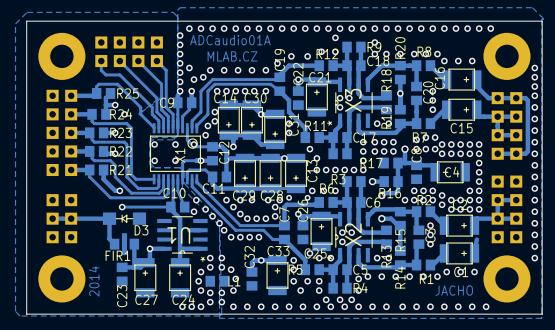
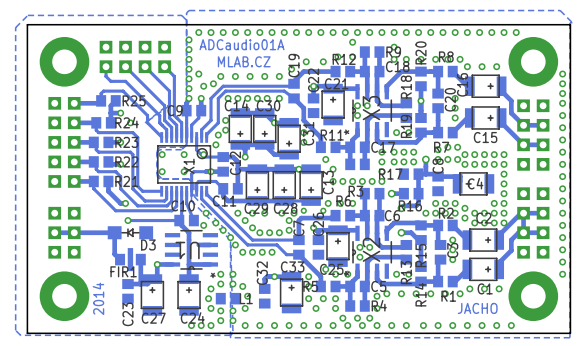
track: (476, 84) (488, 98) (525, 98) (527, 100) (527, 151) (525, 153) (497, 153) -> (501, 91) (511, 100) (511, 113) (523, 125)
track: (476, 116) (497, 116) (497, 135) -> (501, 122) (523, 144)
track: (493, 218) (476, 218) -> (523, 213) (521, 213) (501, 232)
track: (476, 239) (475, 245) -> (518, 232) (511, 240) (511, 250) (500, 261)

